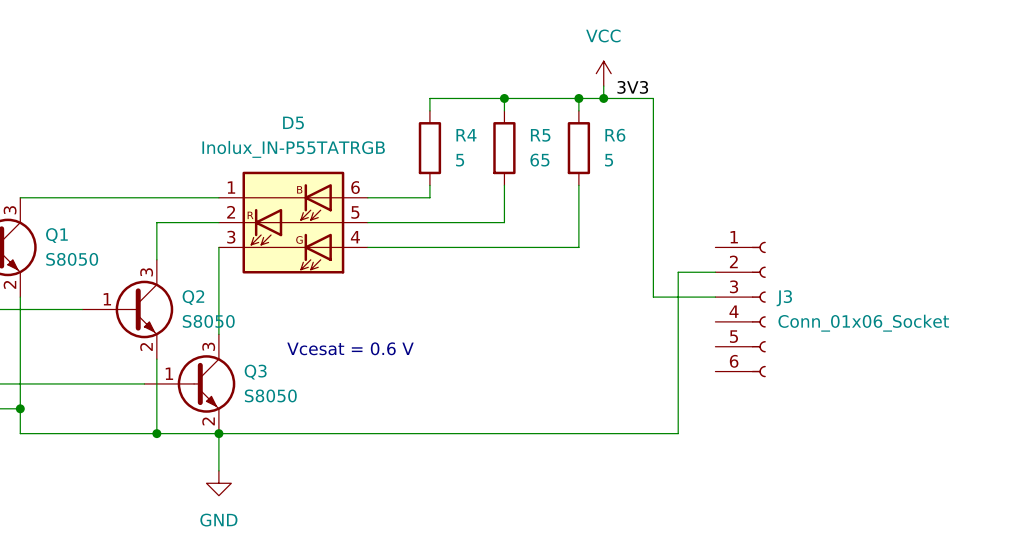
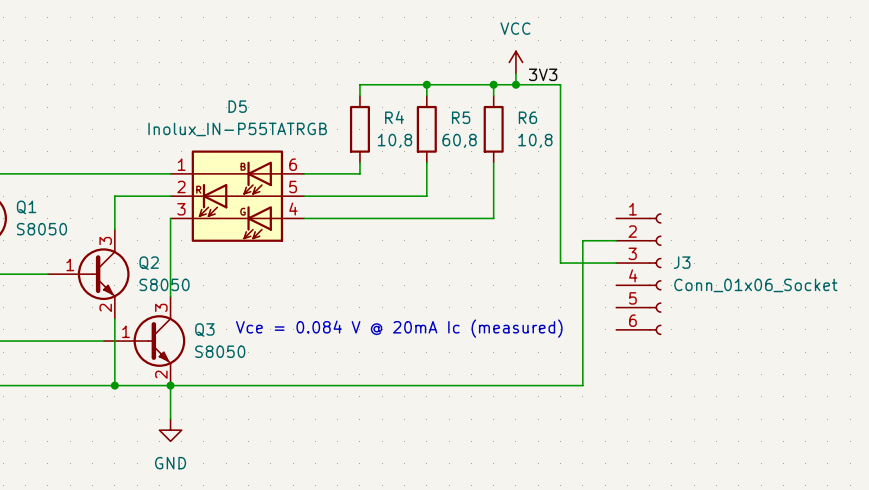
R4 value: 5 (460, 160) -> 10,8 (395, 140)
R5 value: 65 (539, 160) -> 60,8 (459, 140)
R6 value: 5 (609, 160) -> 10,8 (535, 140)
text: Vcesat = 0.6 V (350, 348) -> none
text: none -> Vce = 0.084 V @ 20mA Ic (measured) (399, 328)

